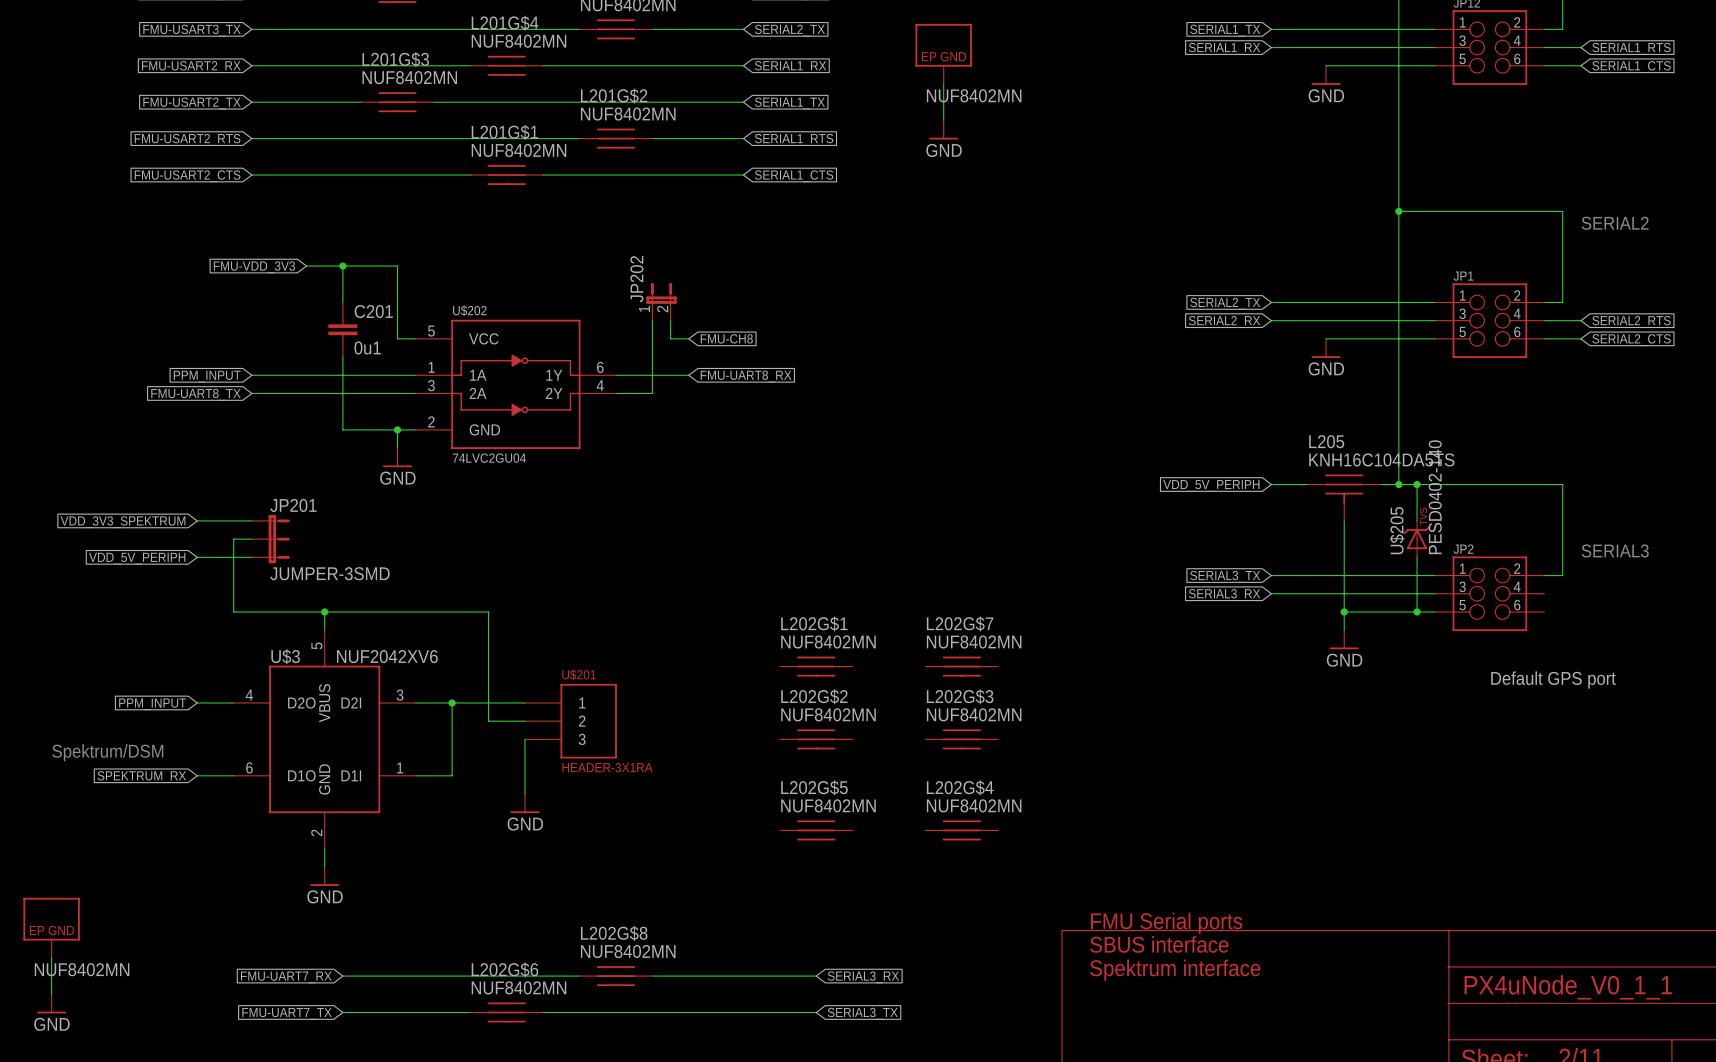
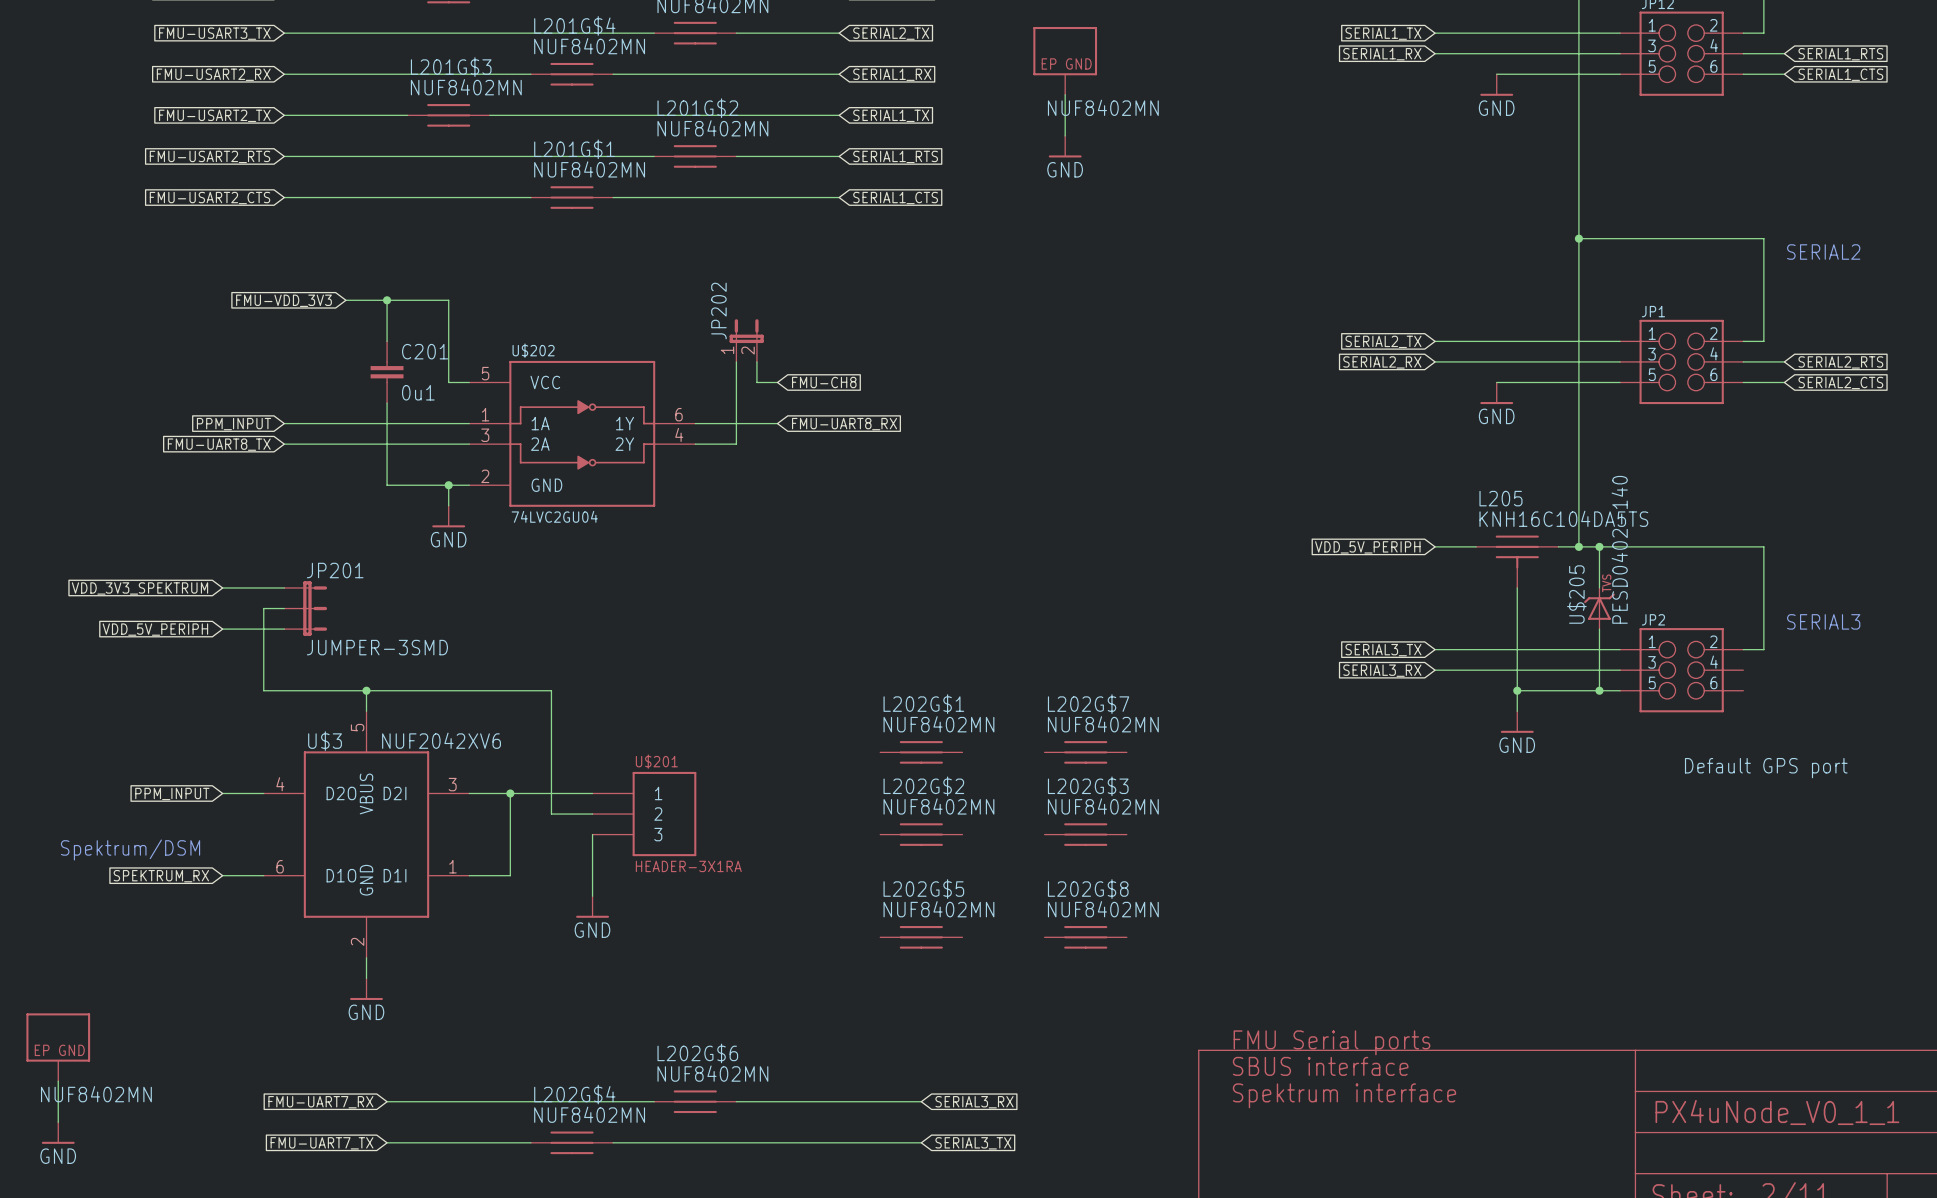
L202G$4 name: L202G$4 (960, 787) -> L202G$8 (1088, 889)
L202G$8 name: L202G$8 (614, 933) -> L202G$6 (697, 1053)
L202G$6 name: L202G$6 (504, 969) -> L202G$4 (574, 1094)

